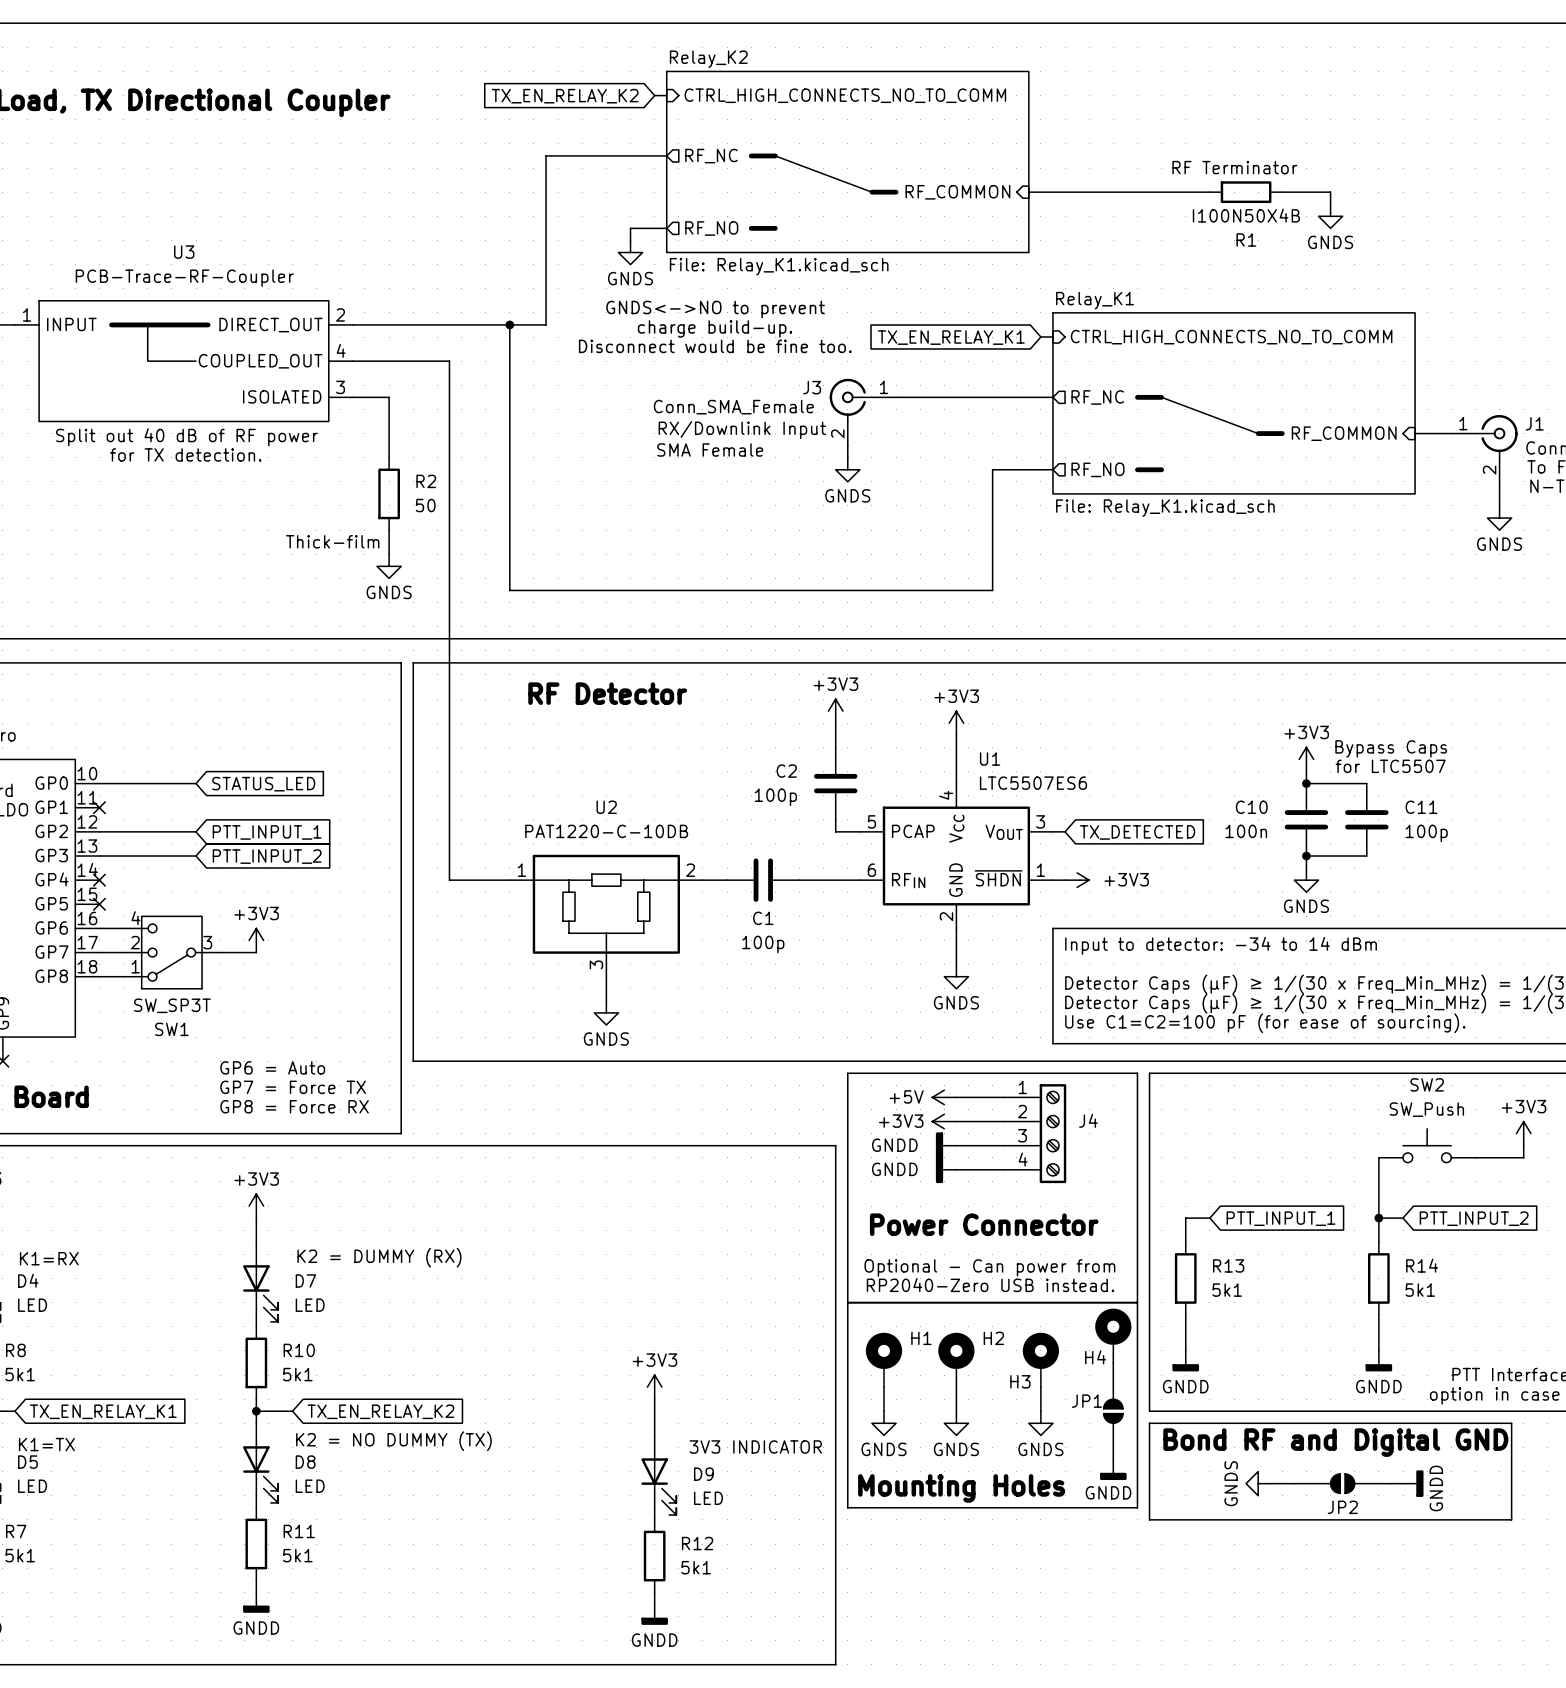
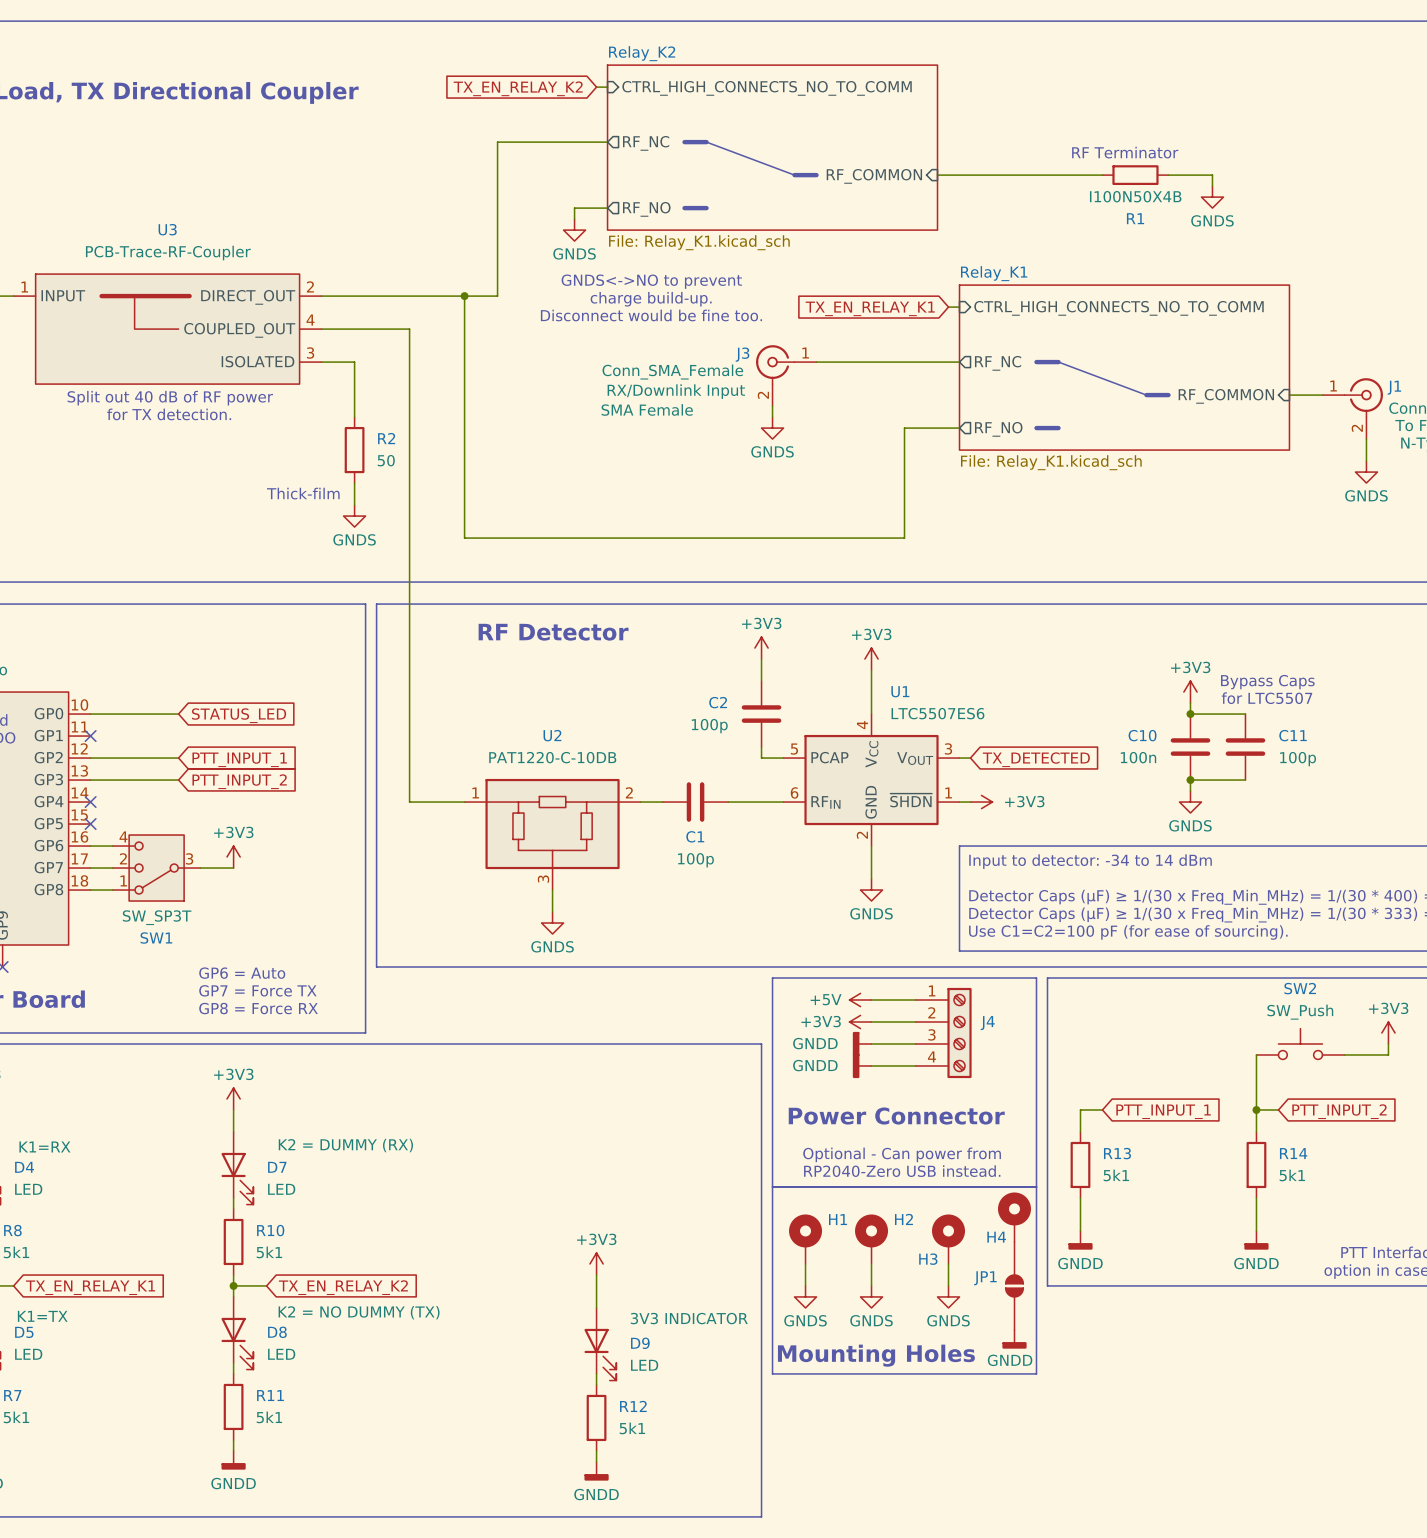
line: (1149, 1423) (1511, 1423) (1511, 1519) (1149, 1519) (1149, 1423) -> none
text: Bond RF and Digital GND (1335, 1442) -> none
power symbol: GNDS (1258, 1483) -> none
wire: (1270, 1483) (1294, 1483) -> none
JP2: (1342, 1483) -> none
wire: (1390, 1483) (1403, 1483) -> none
power symbol: GNDD (1413, 1483) -> none

